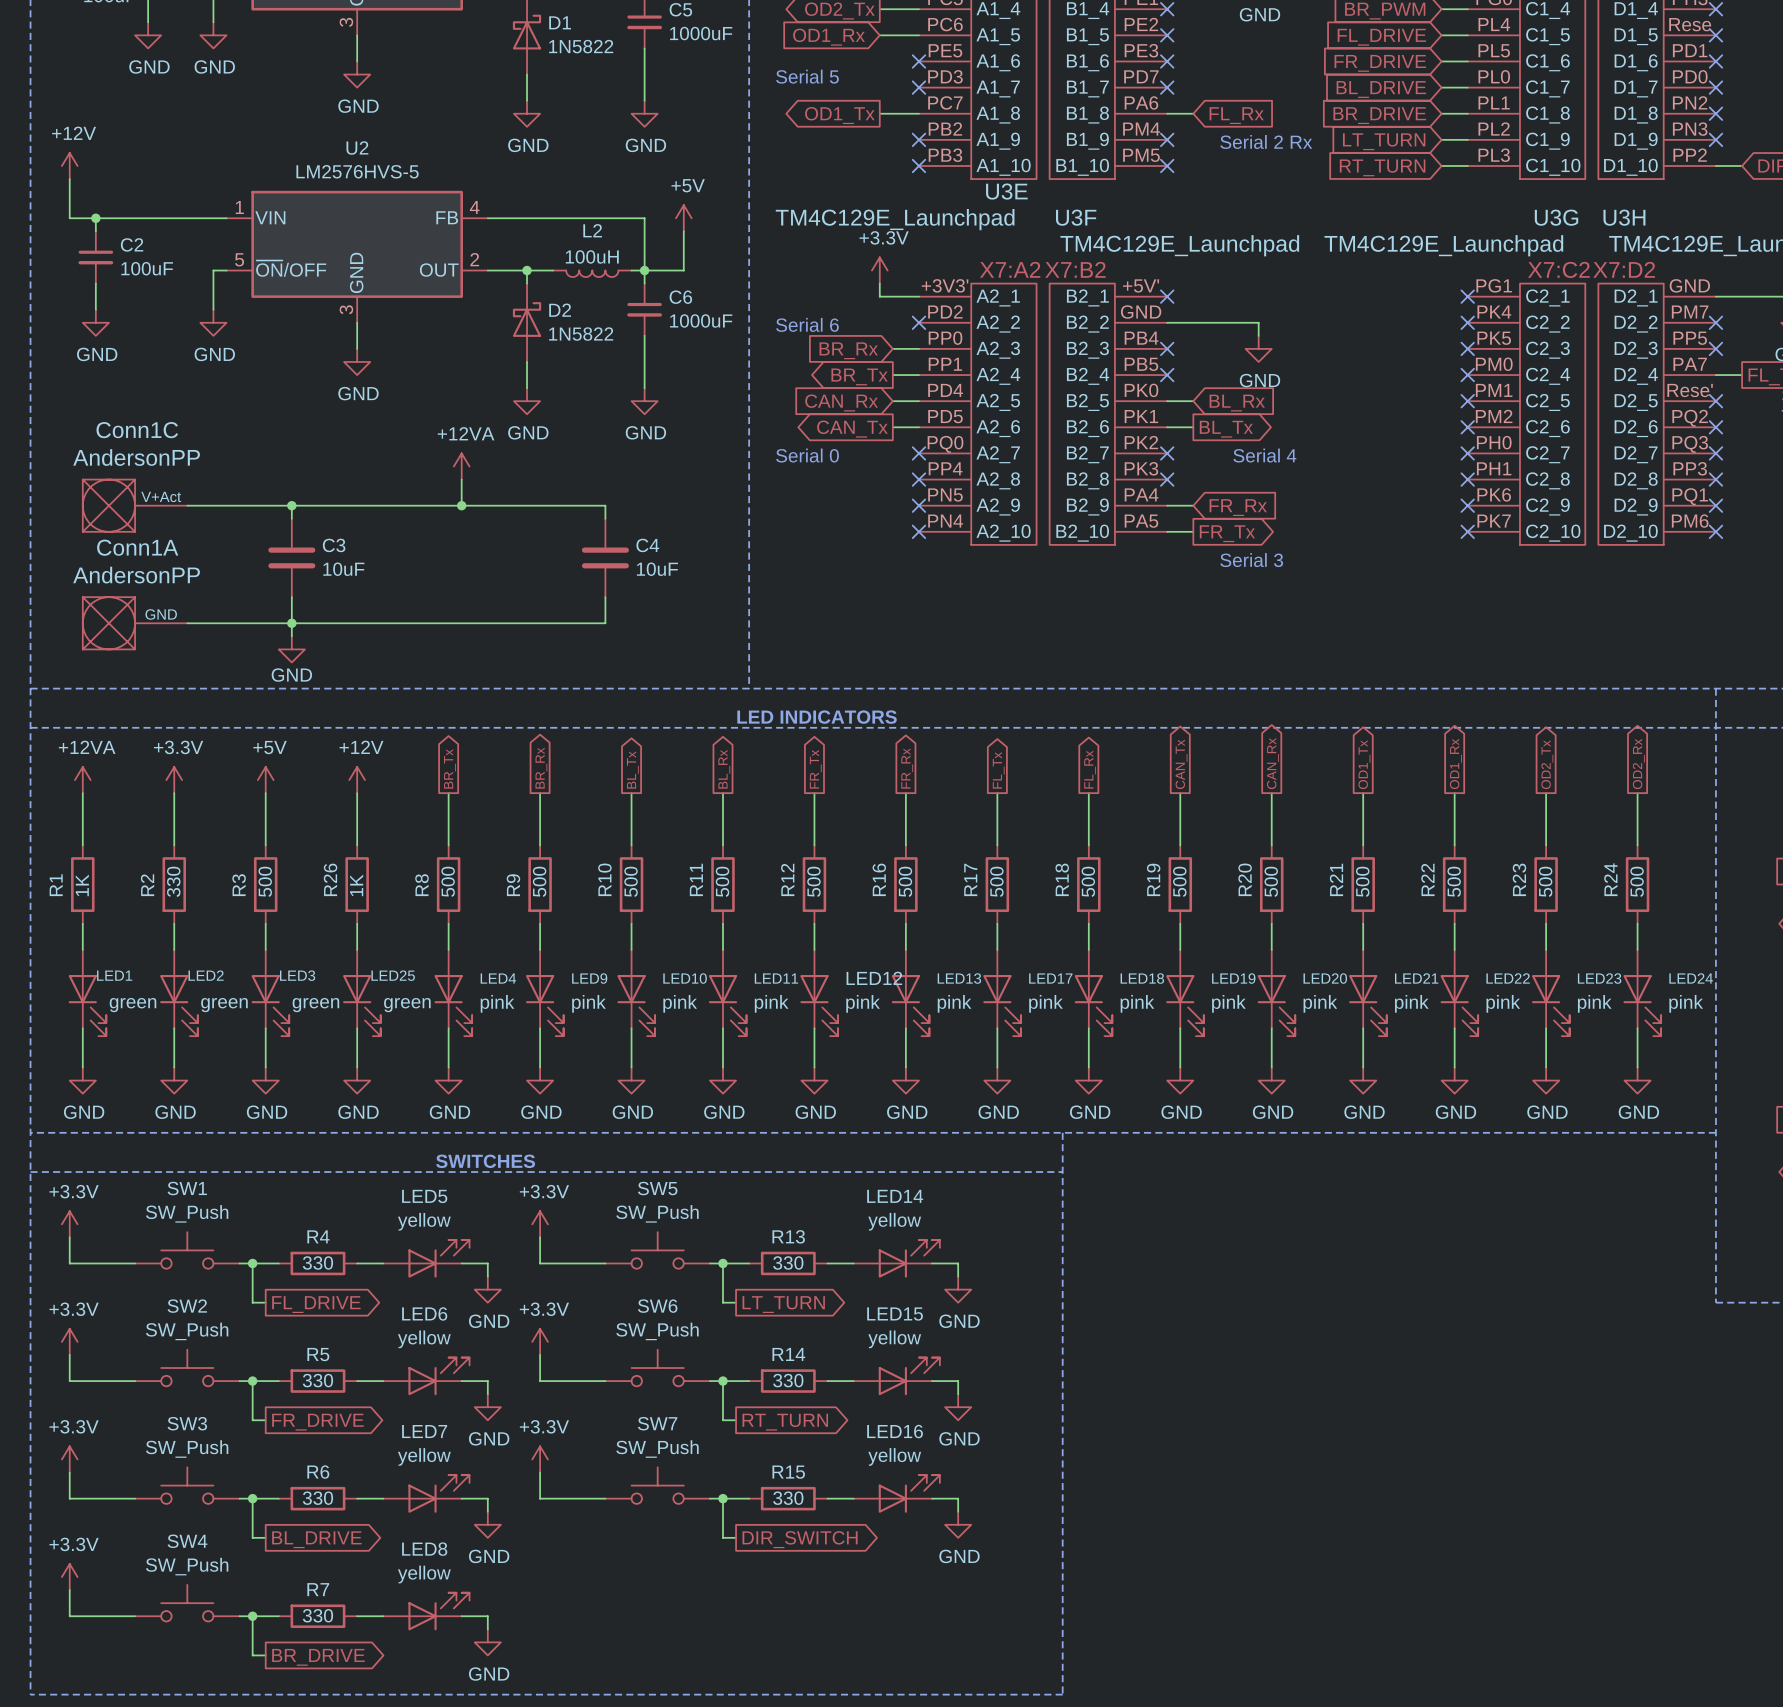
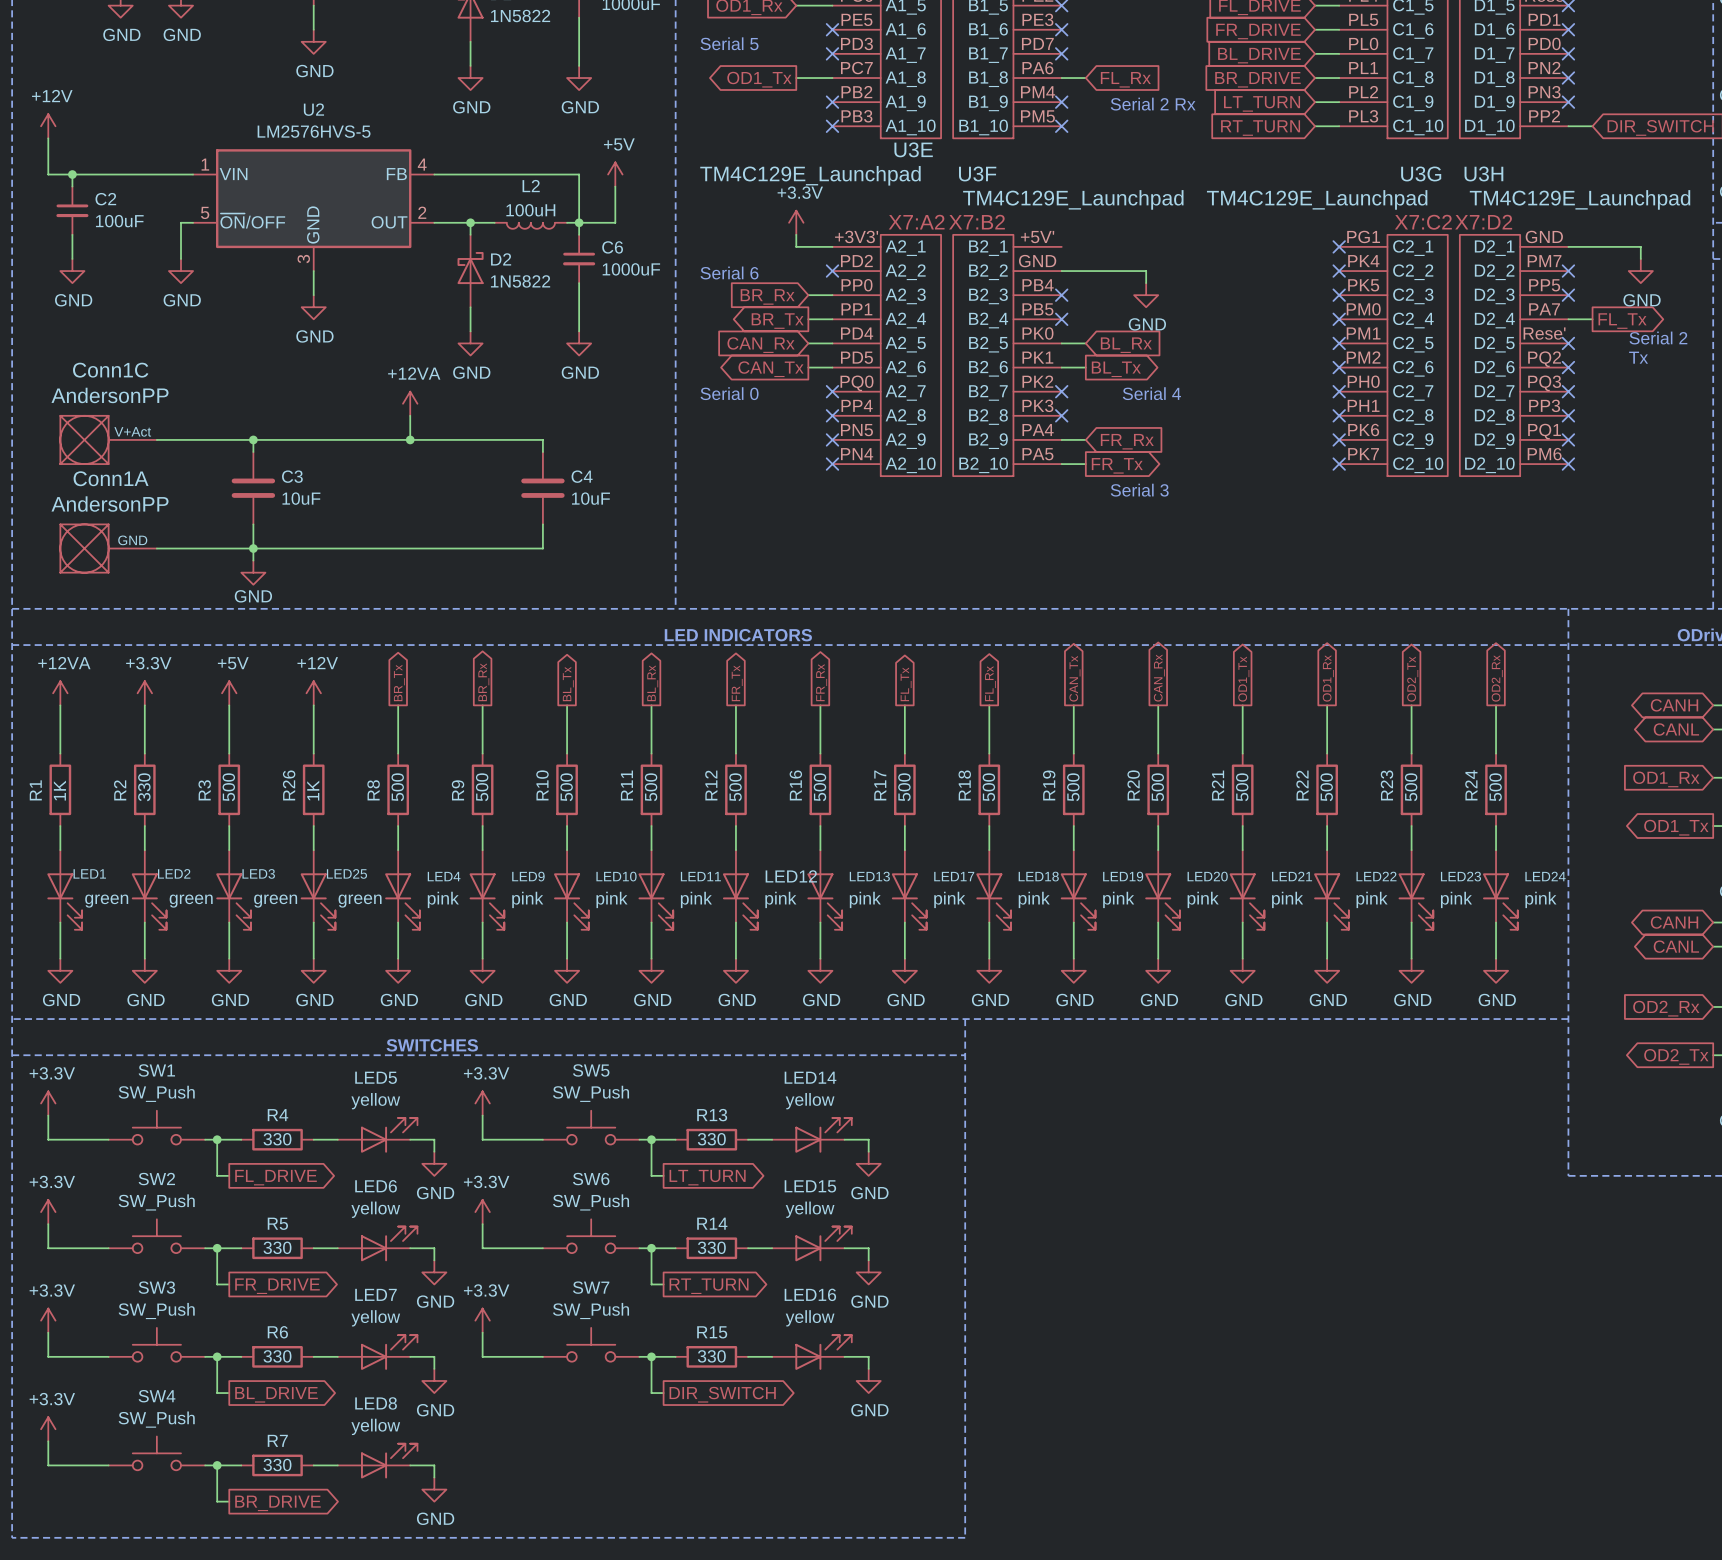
no-connect mark: (1167, 296) -> none

